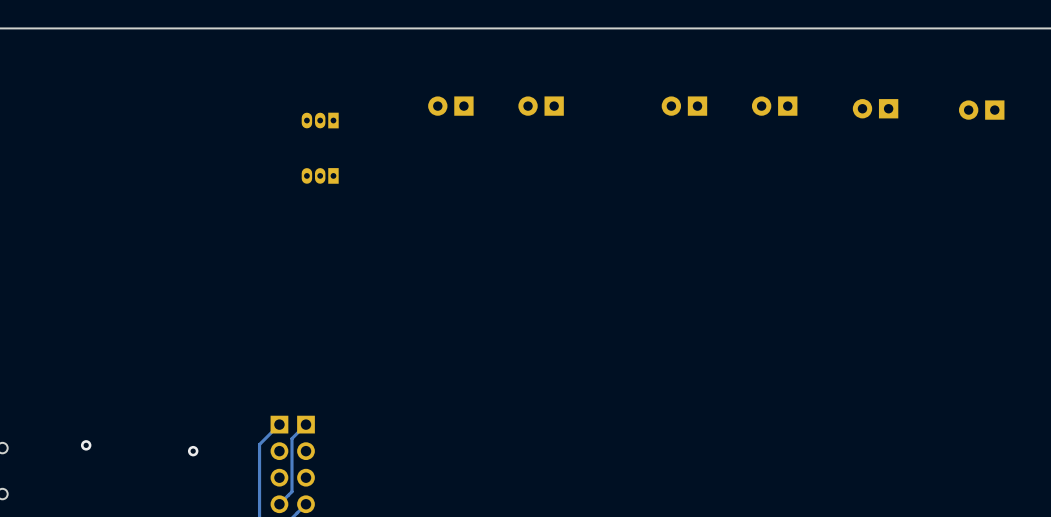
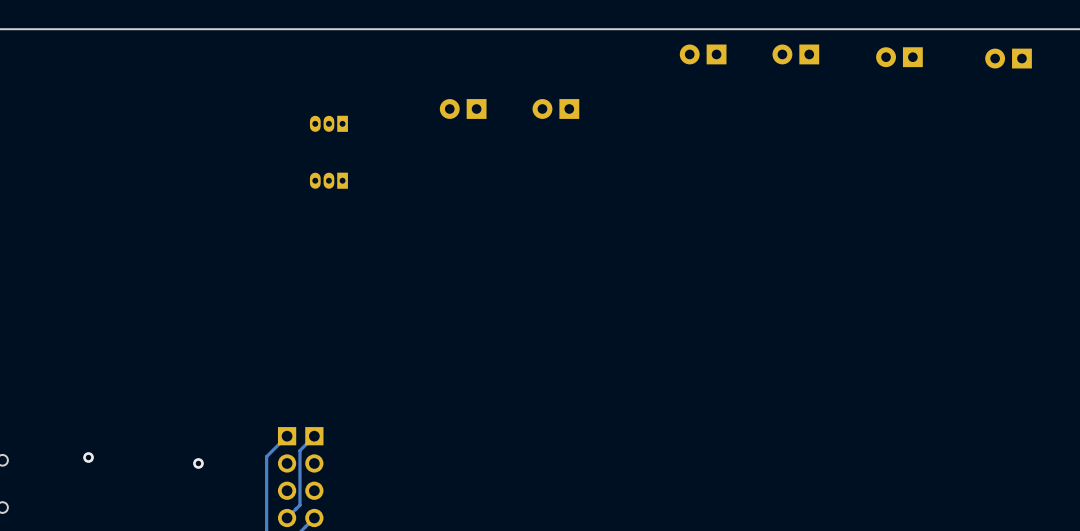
part: none -> (703, 54)
part: none -> (795, 54)
part: (684, 106) -> none
part: (774, 106) -> none
part position: (875, 108) -> (899, 57)
part position: (981, 110) -> (1008, 58)

